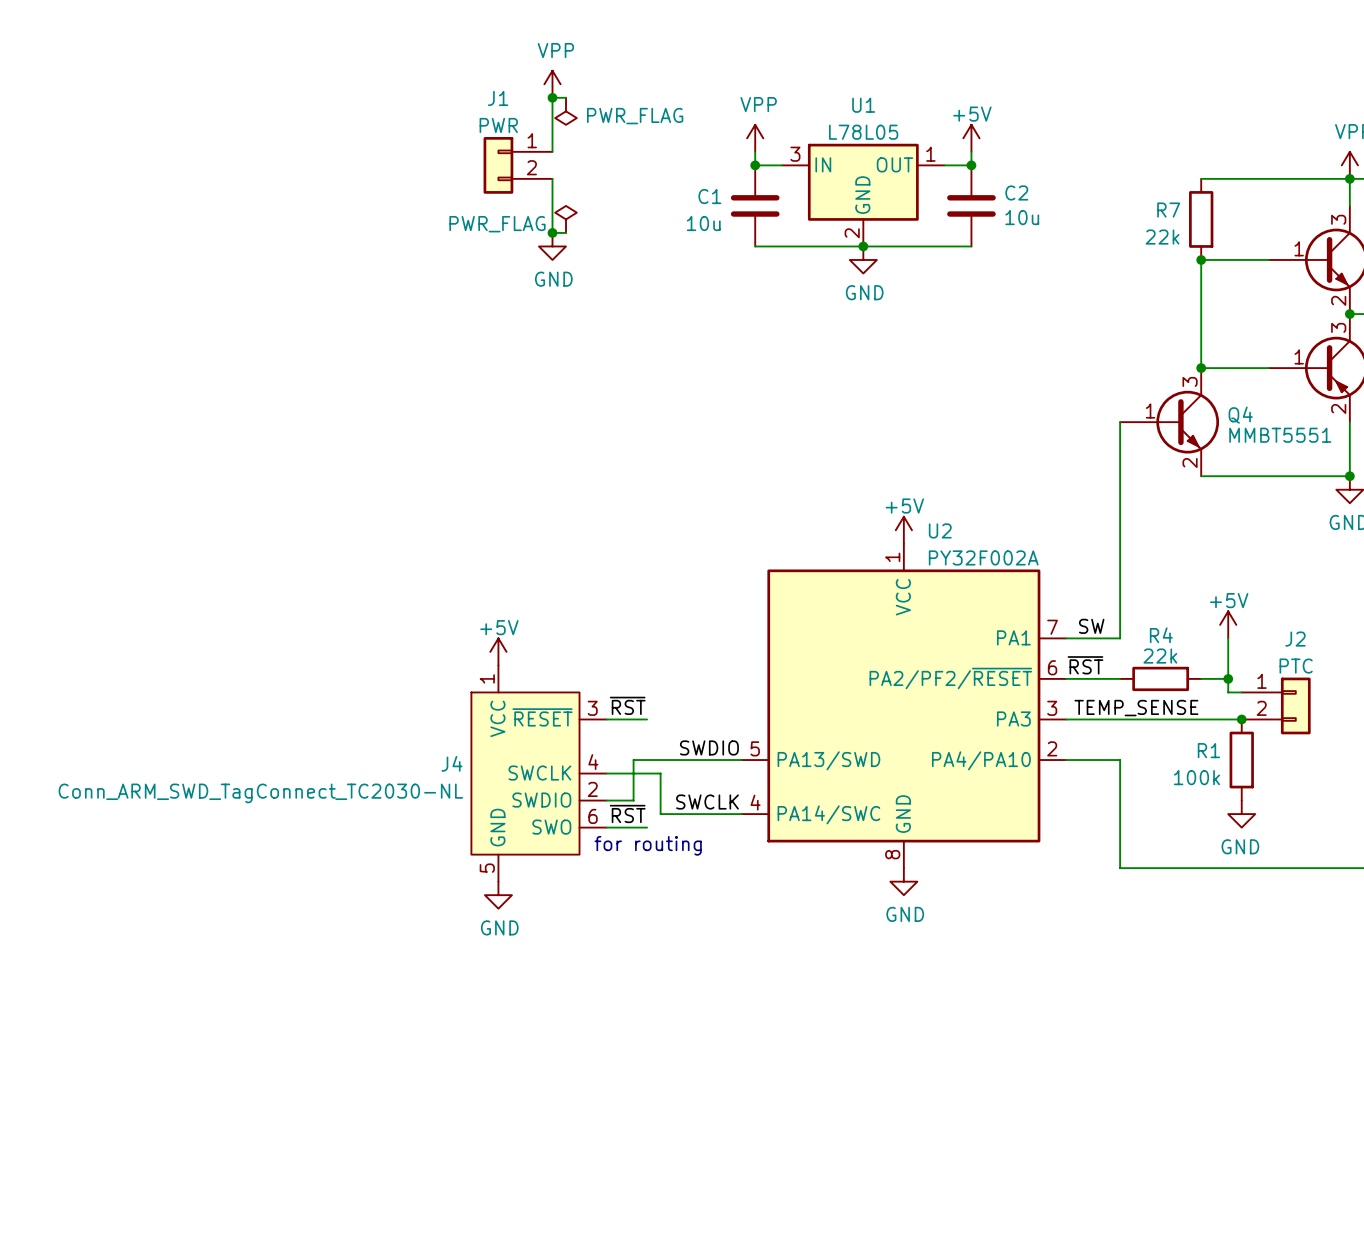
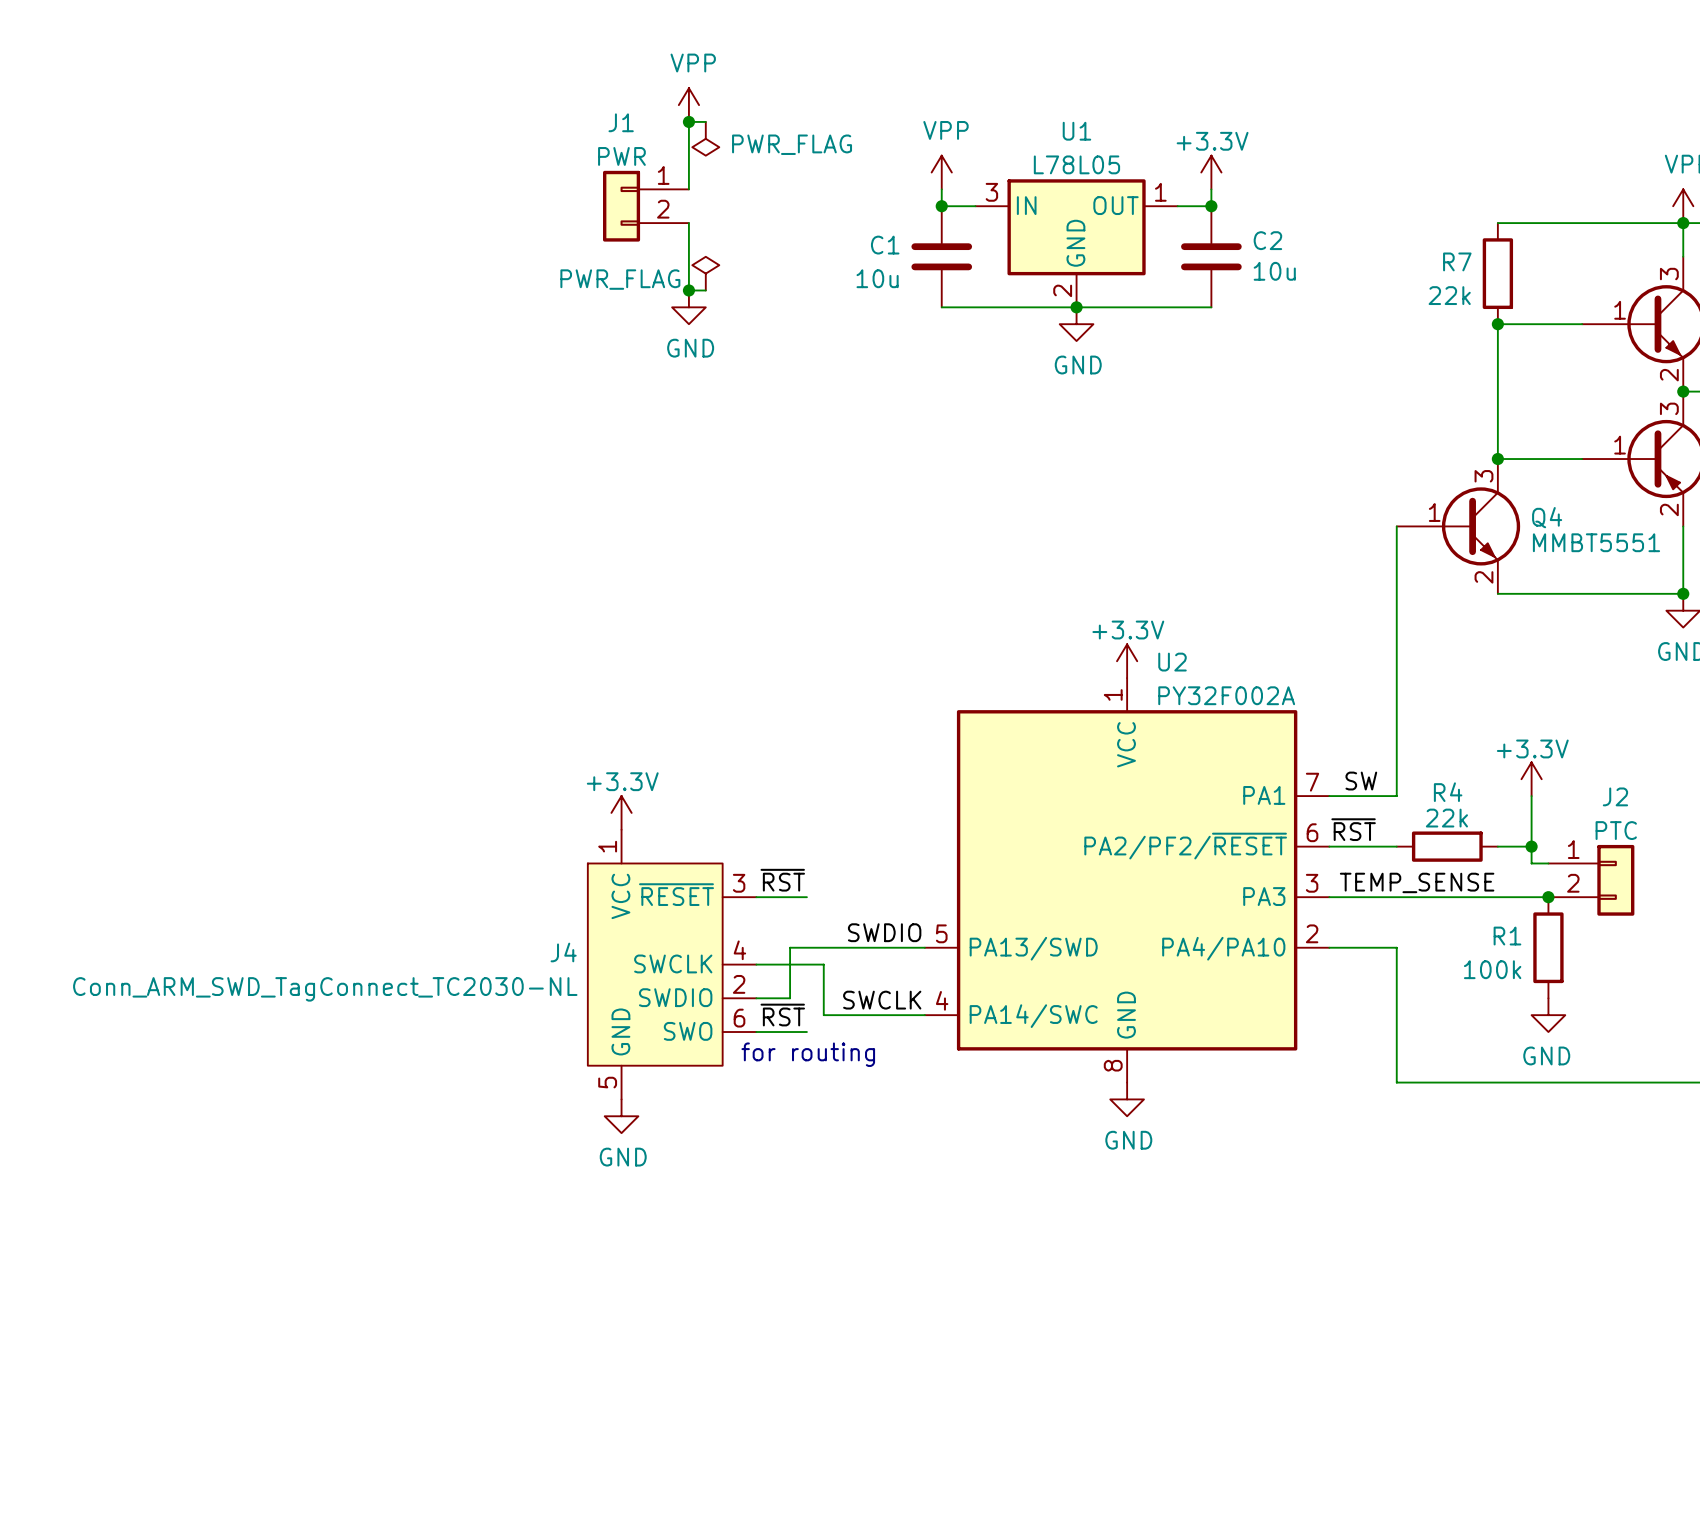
power symbol: +5V (971, 138) -> +3.3V (1211, 172)
power symbol: +5V (903, 530) -> +3.3V (1127, 661)
power symbol: +5V (1228, 624) -> +3.3V (1531, 779)
power symbol: +5V (498, 651) -> +3.3V (621, 812)

